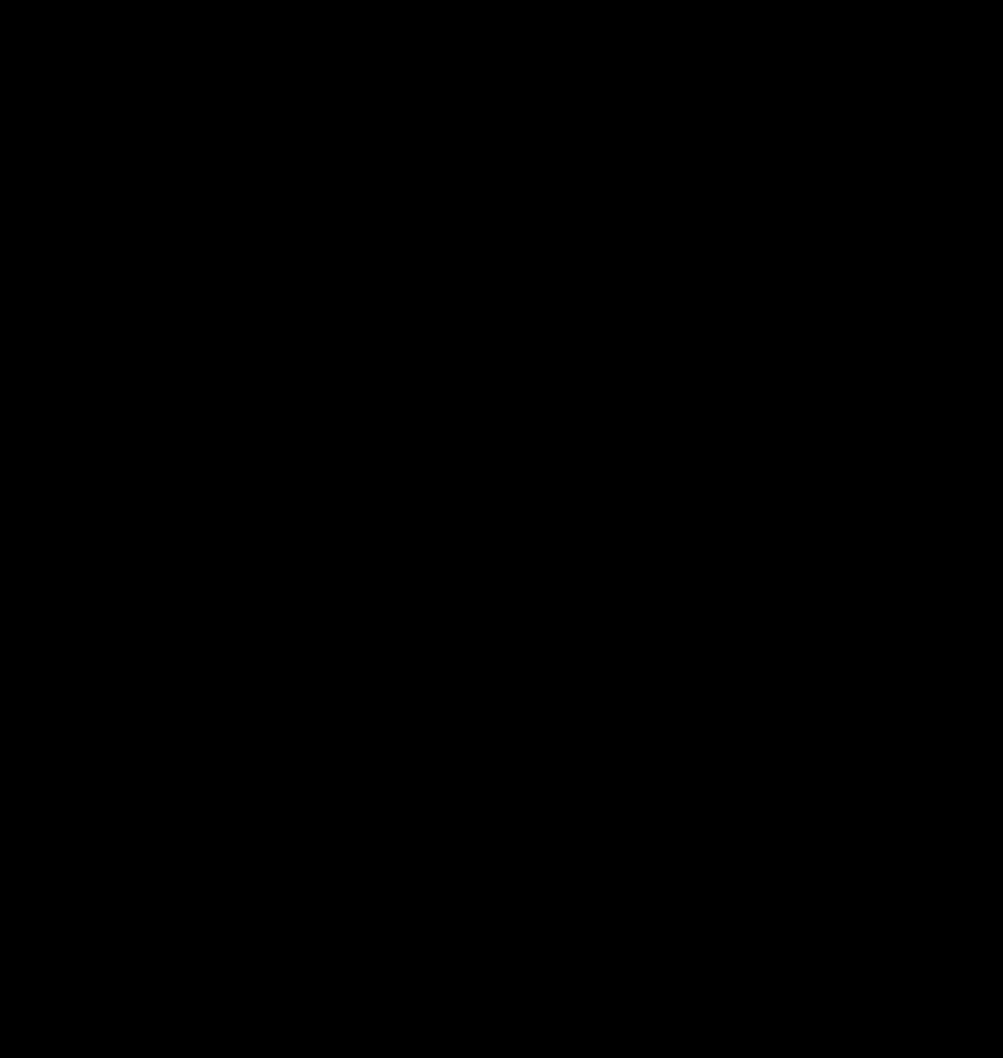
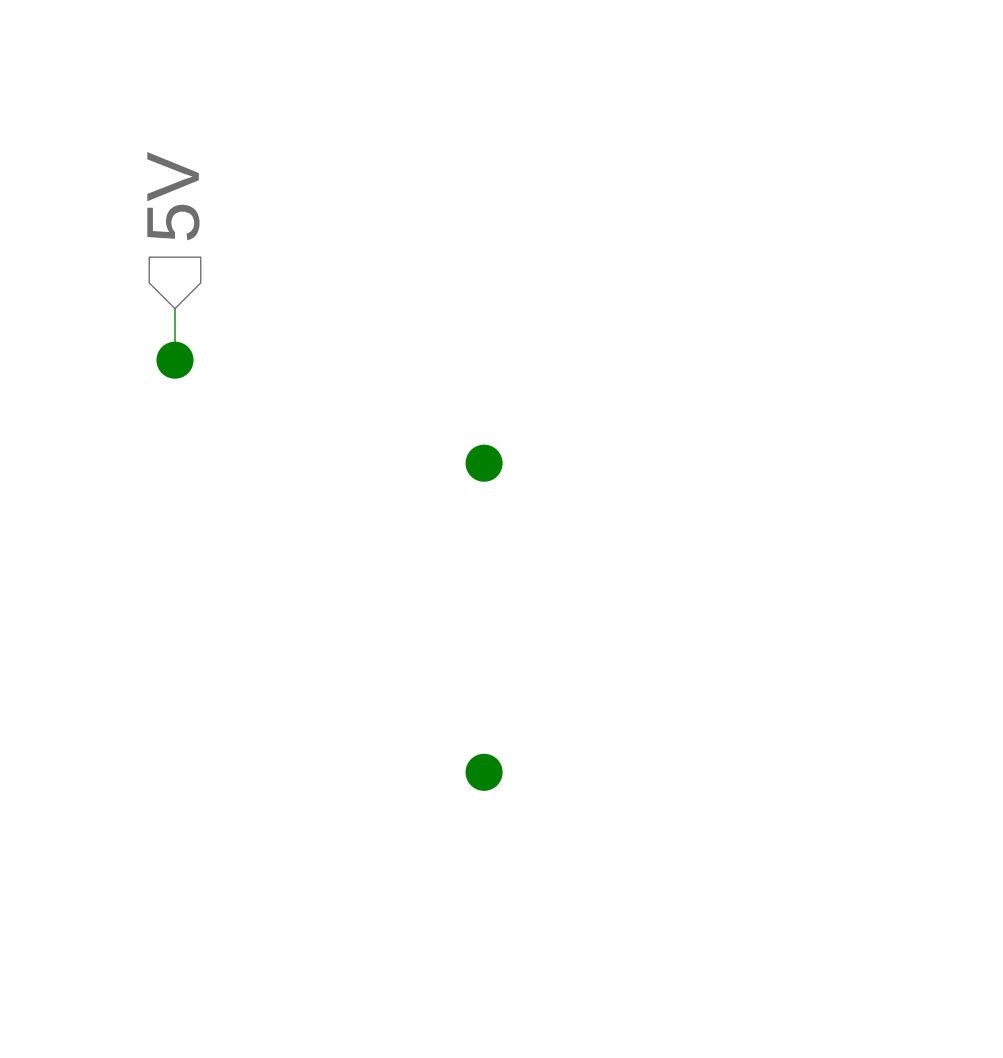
hierarchical label: none -> 5V (173, 196)
wire: none -> (175, 308) (175, 360)
junction: none -> (175, 360)
junction: none -> (484, 463)
junction: none -> (484, 772)

